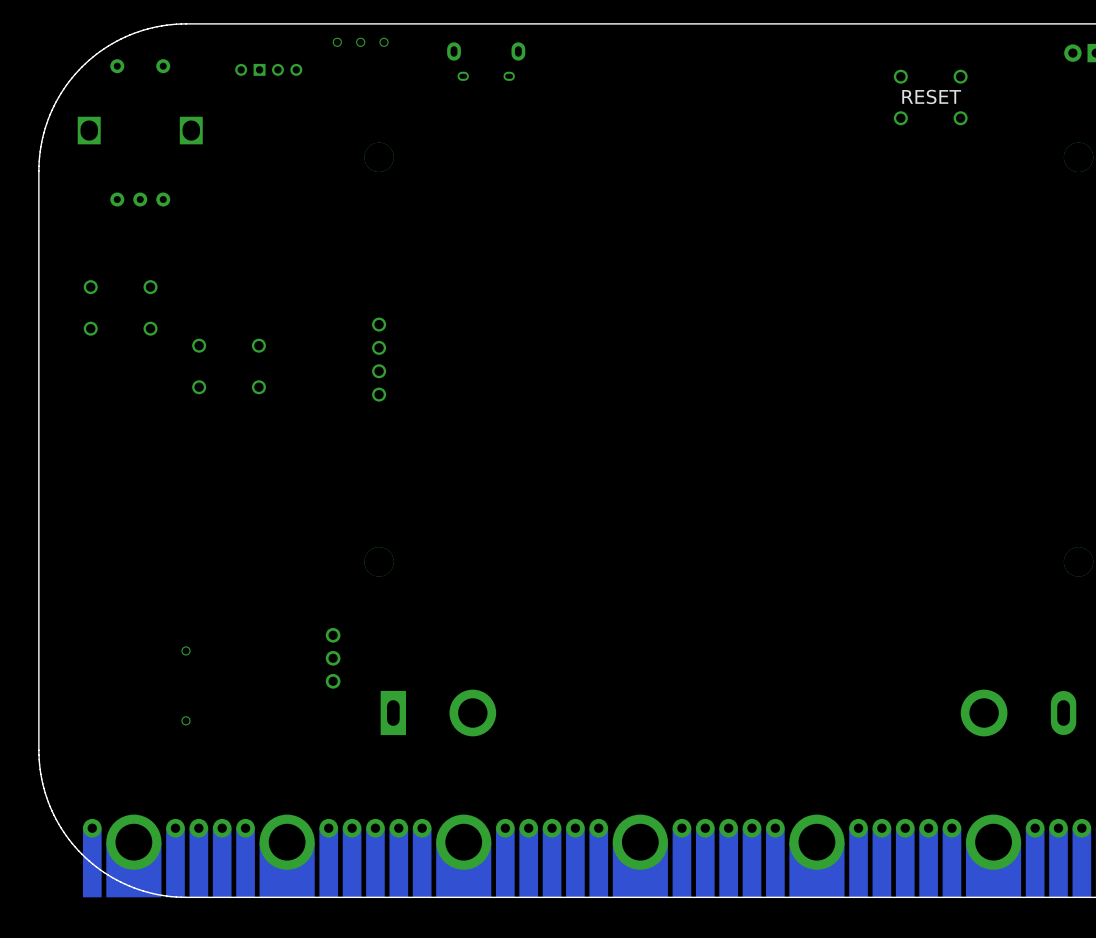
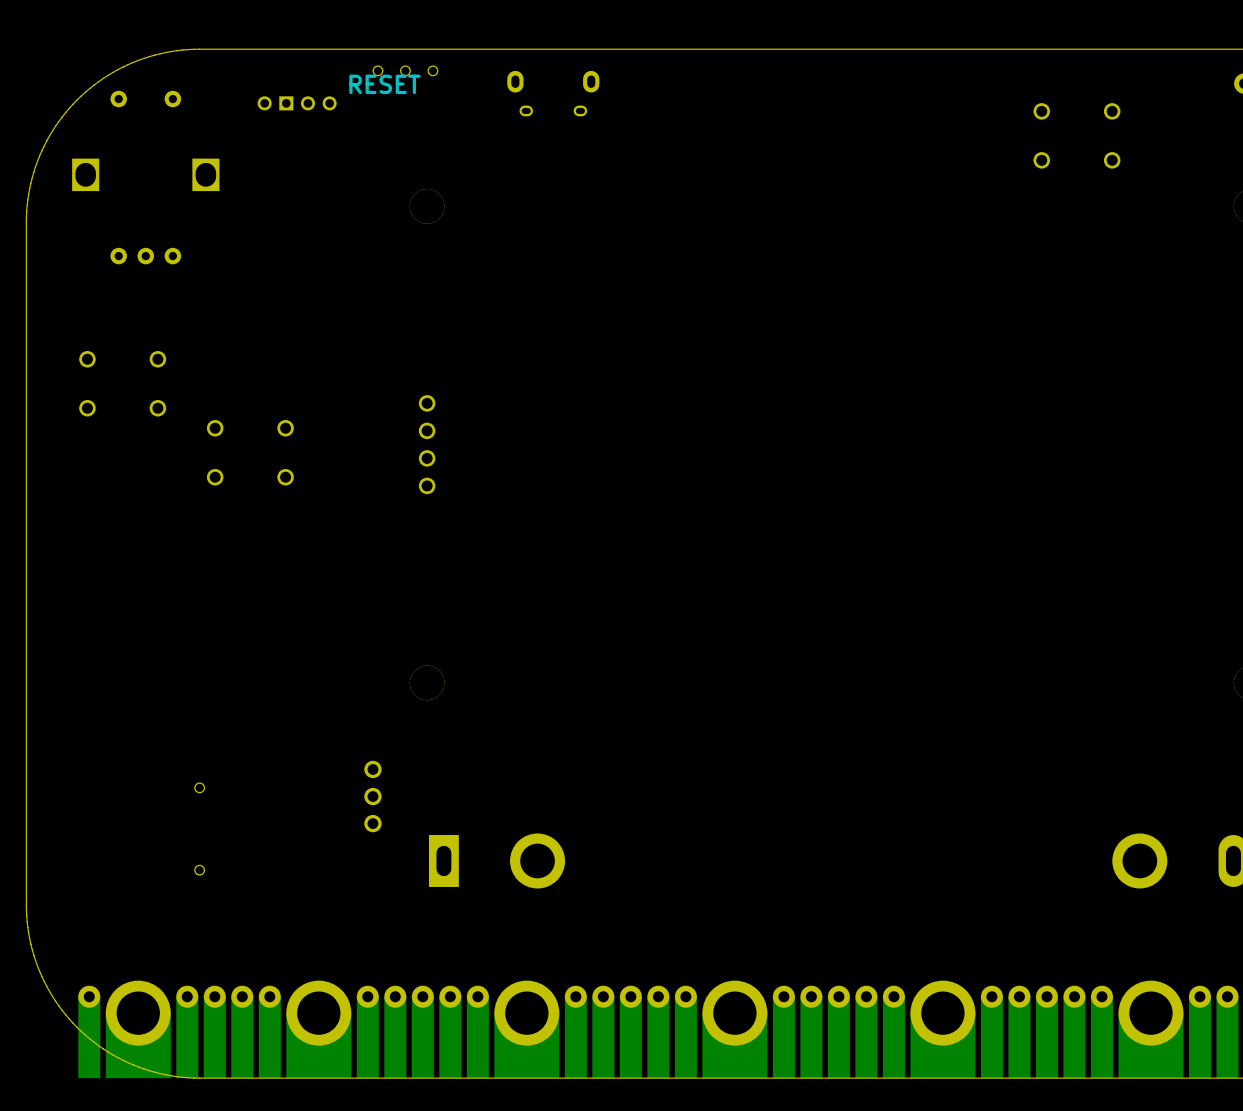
text: none -> RESET (384, 84)
text: RESET (931, 96) -> none

